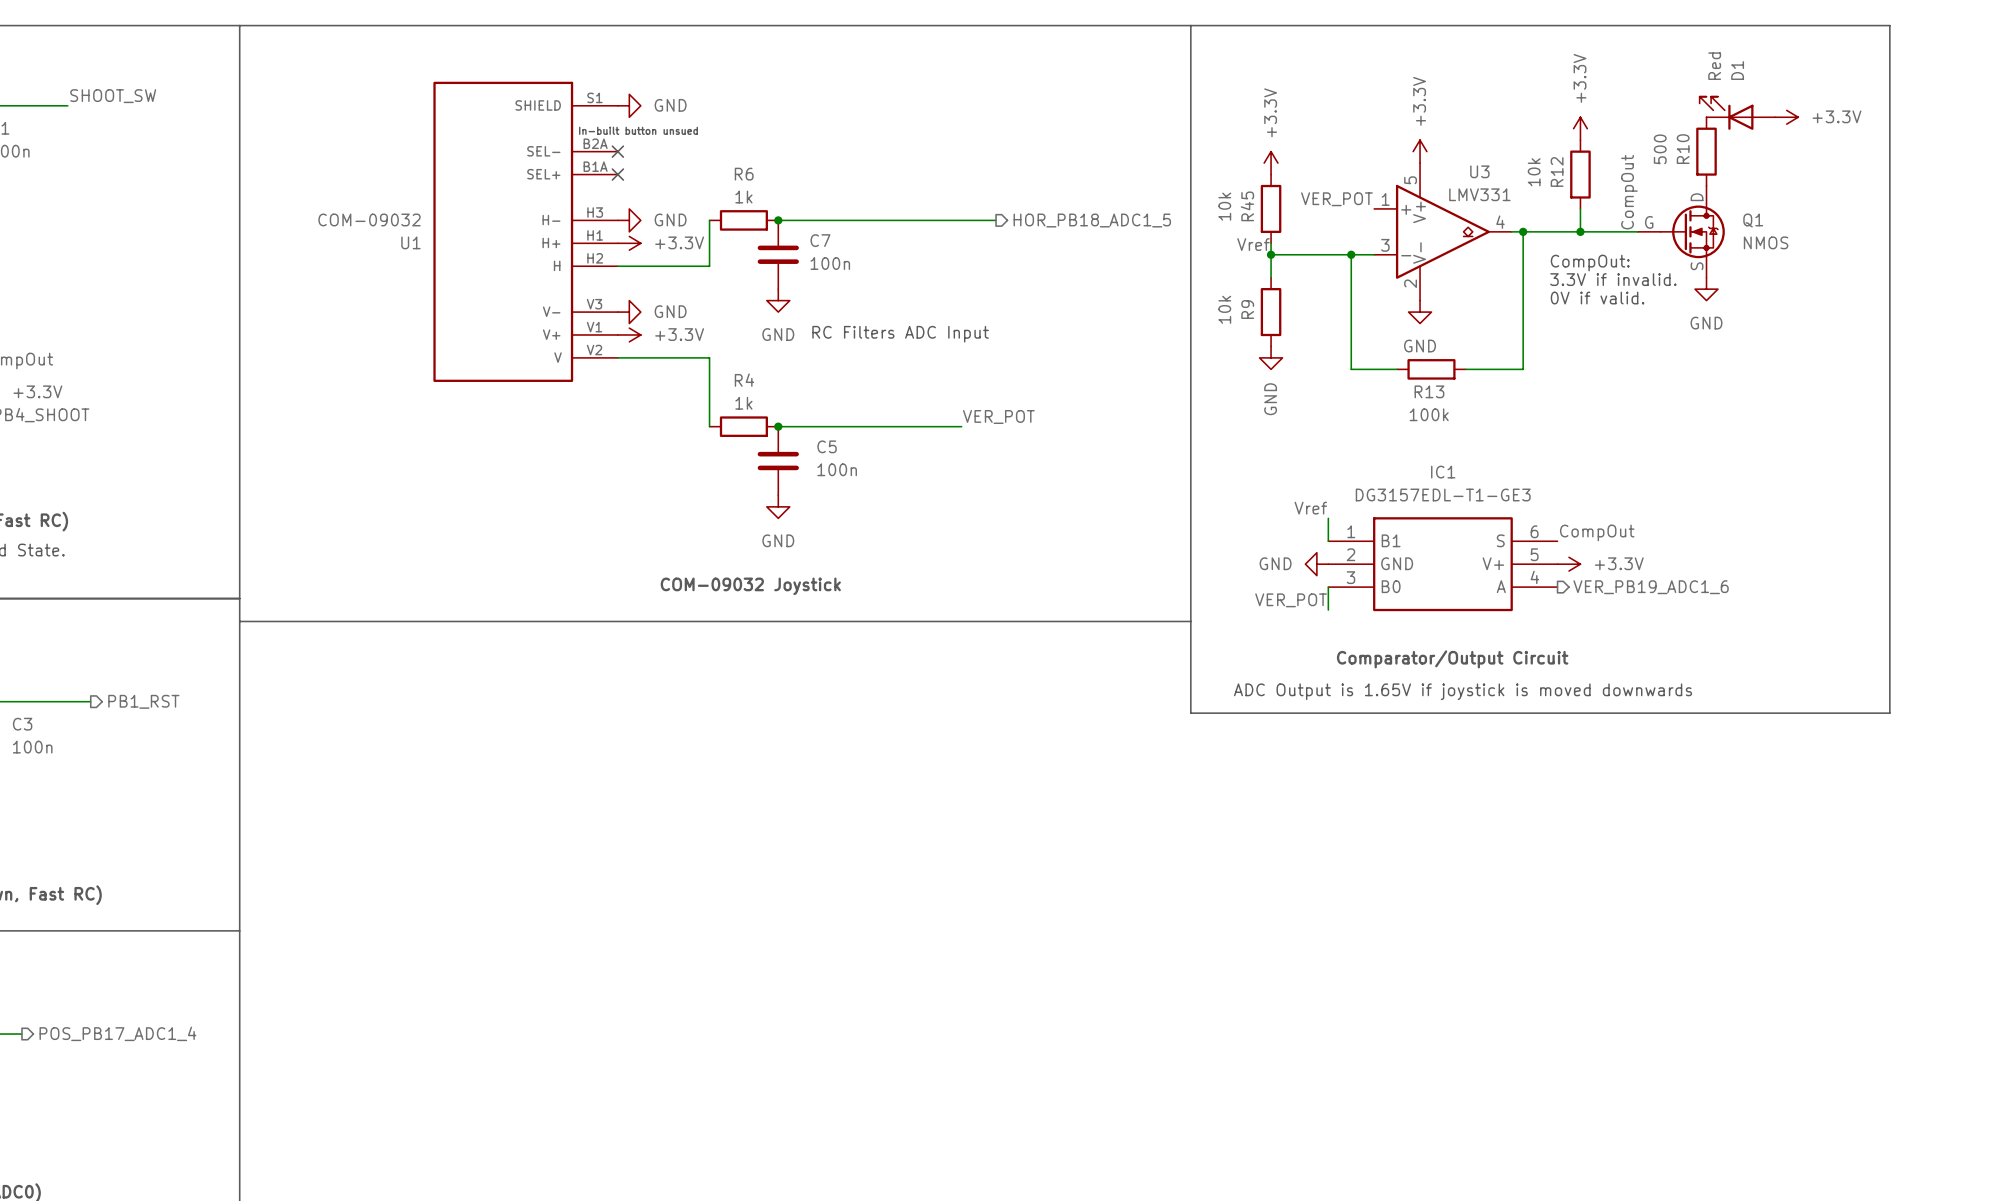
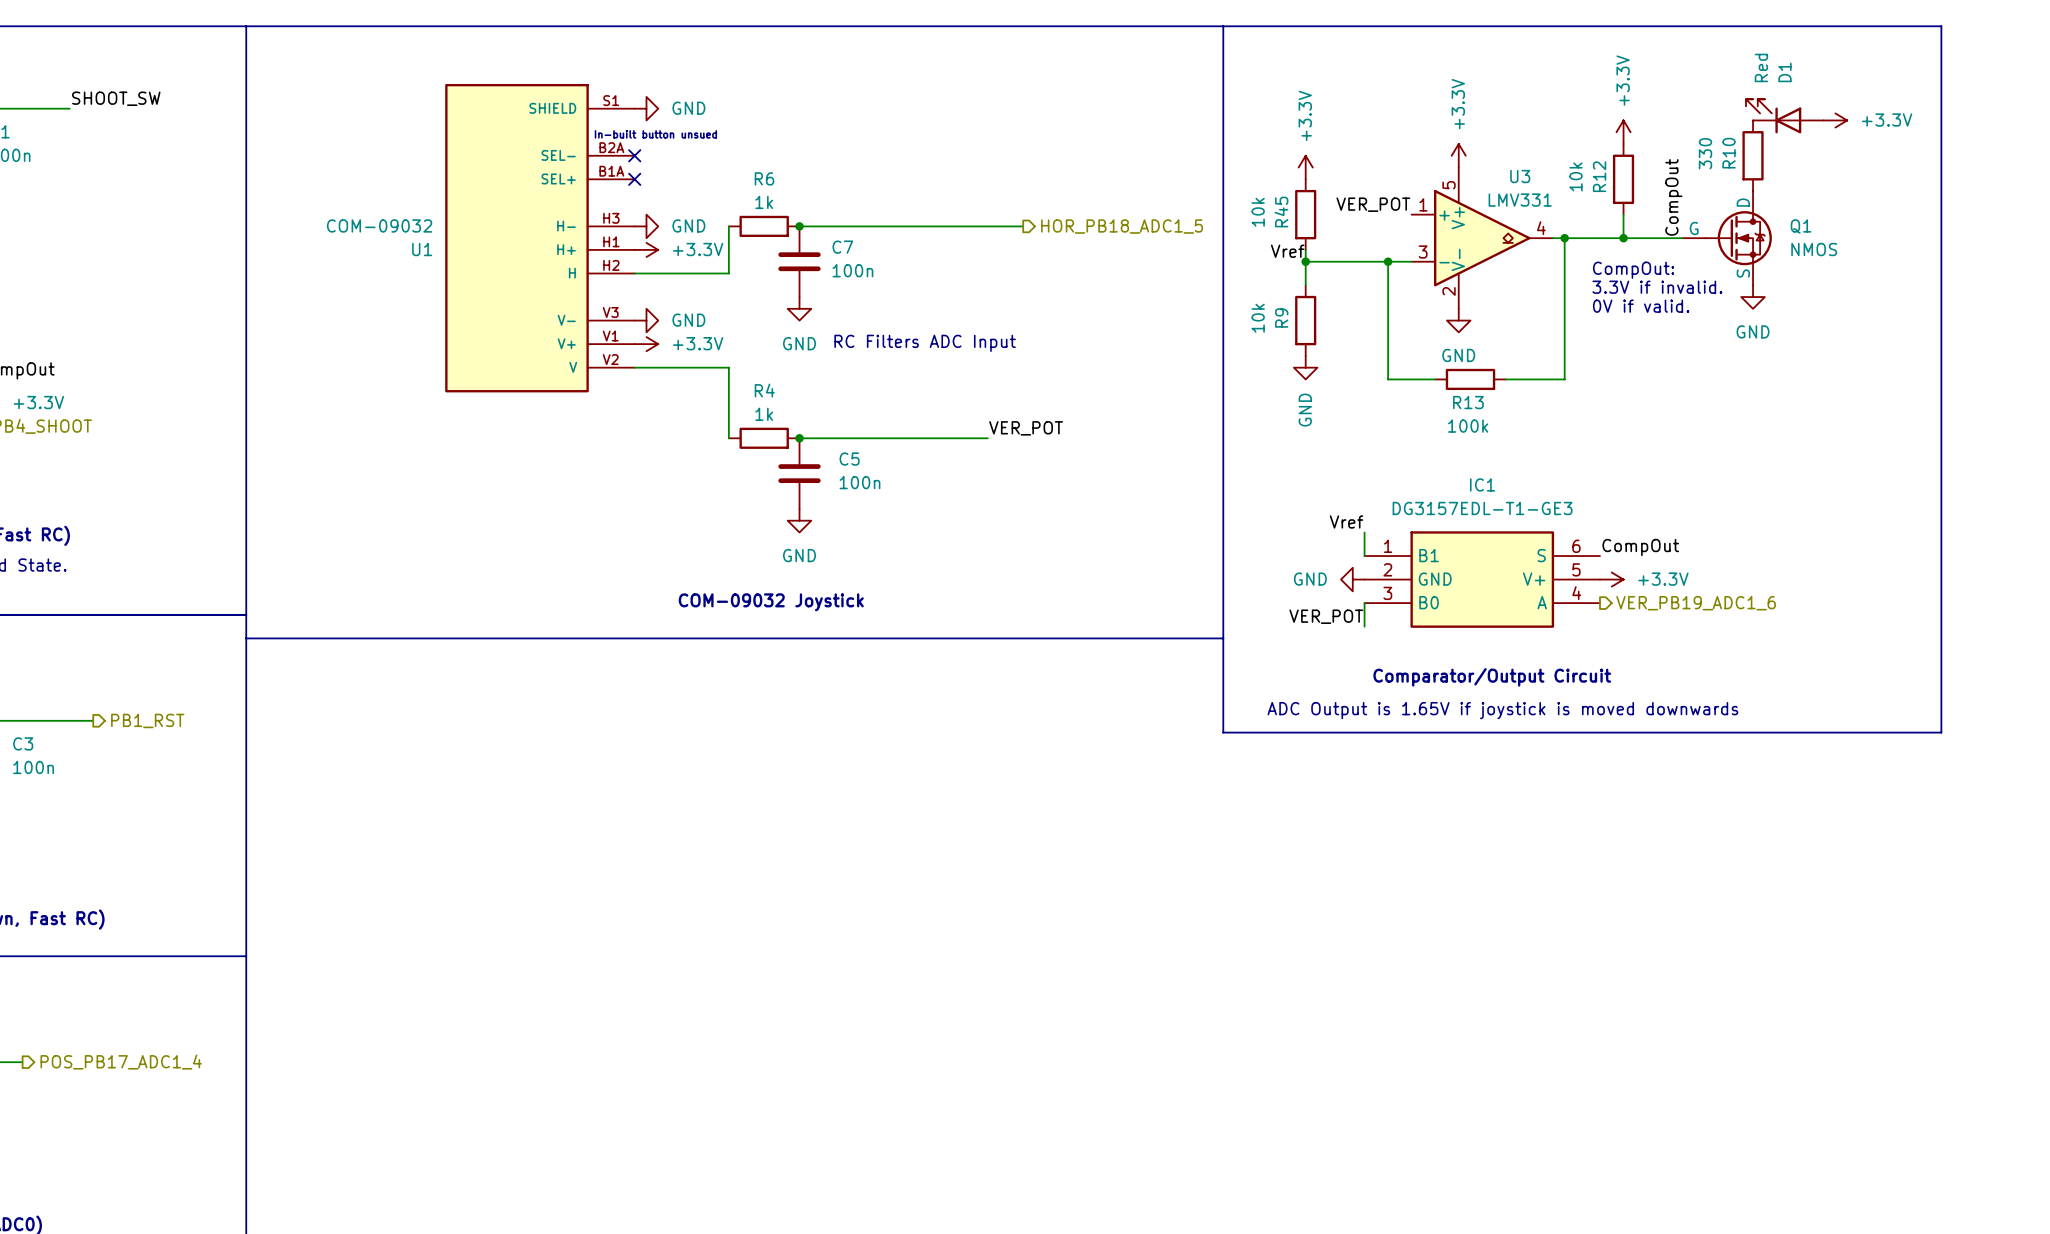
R10 value: 500 (1660, 149) -> 330 (1705, 153)

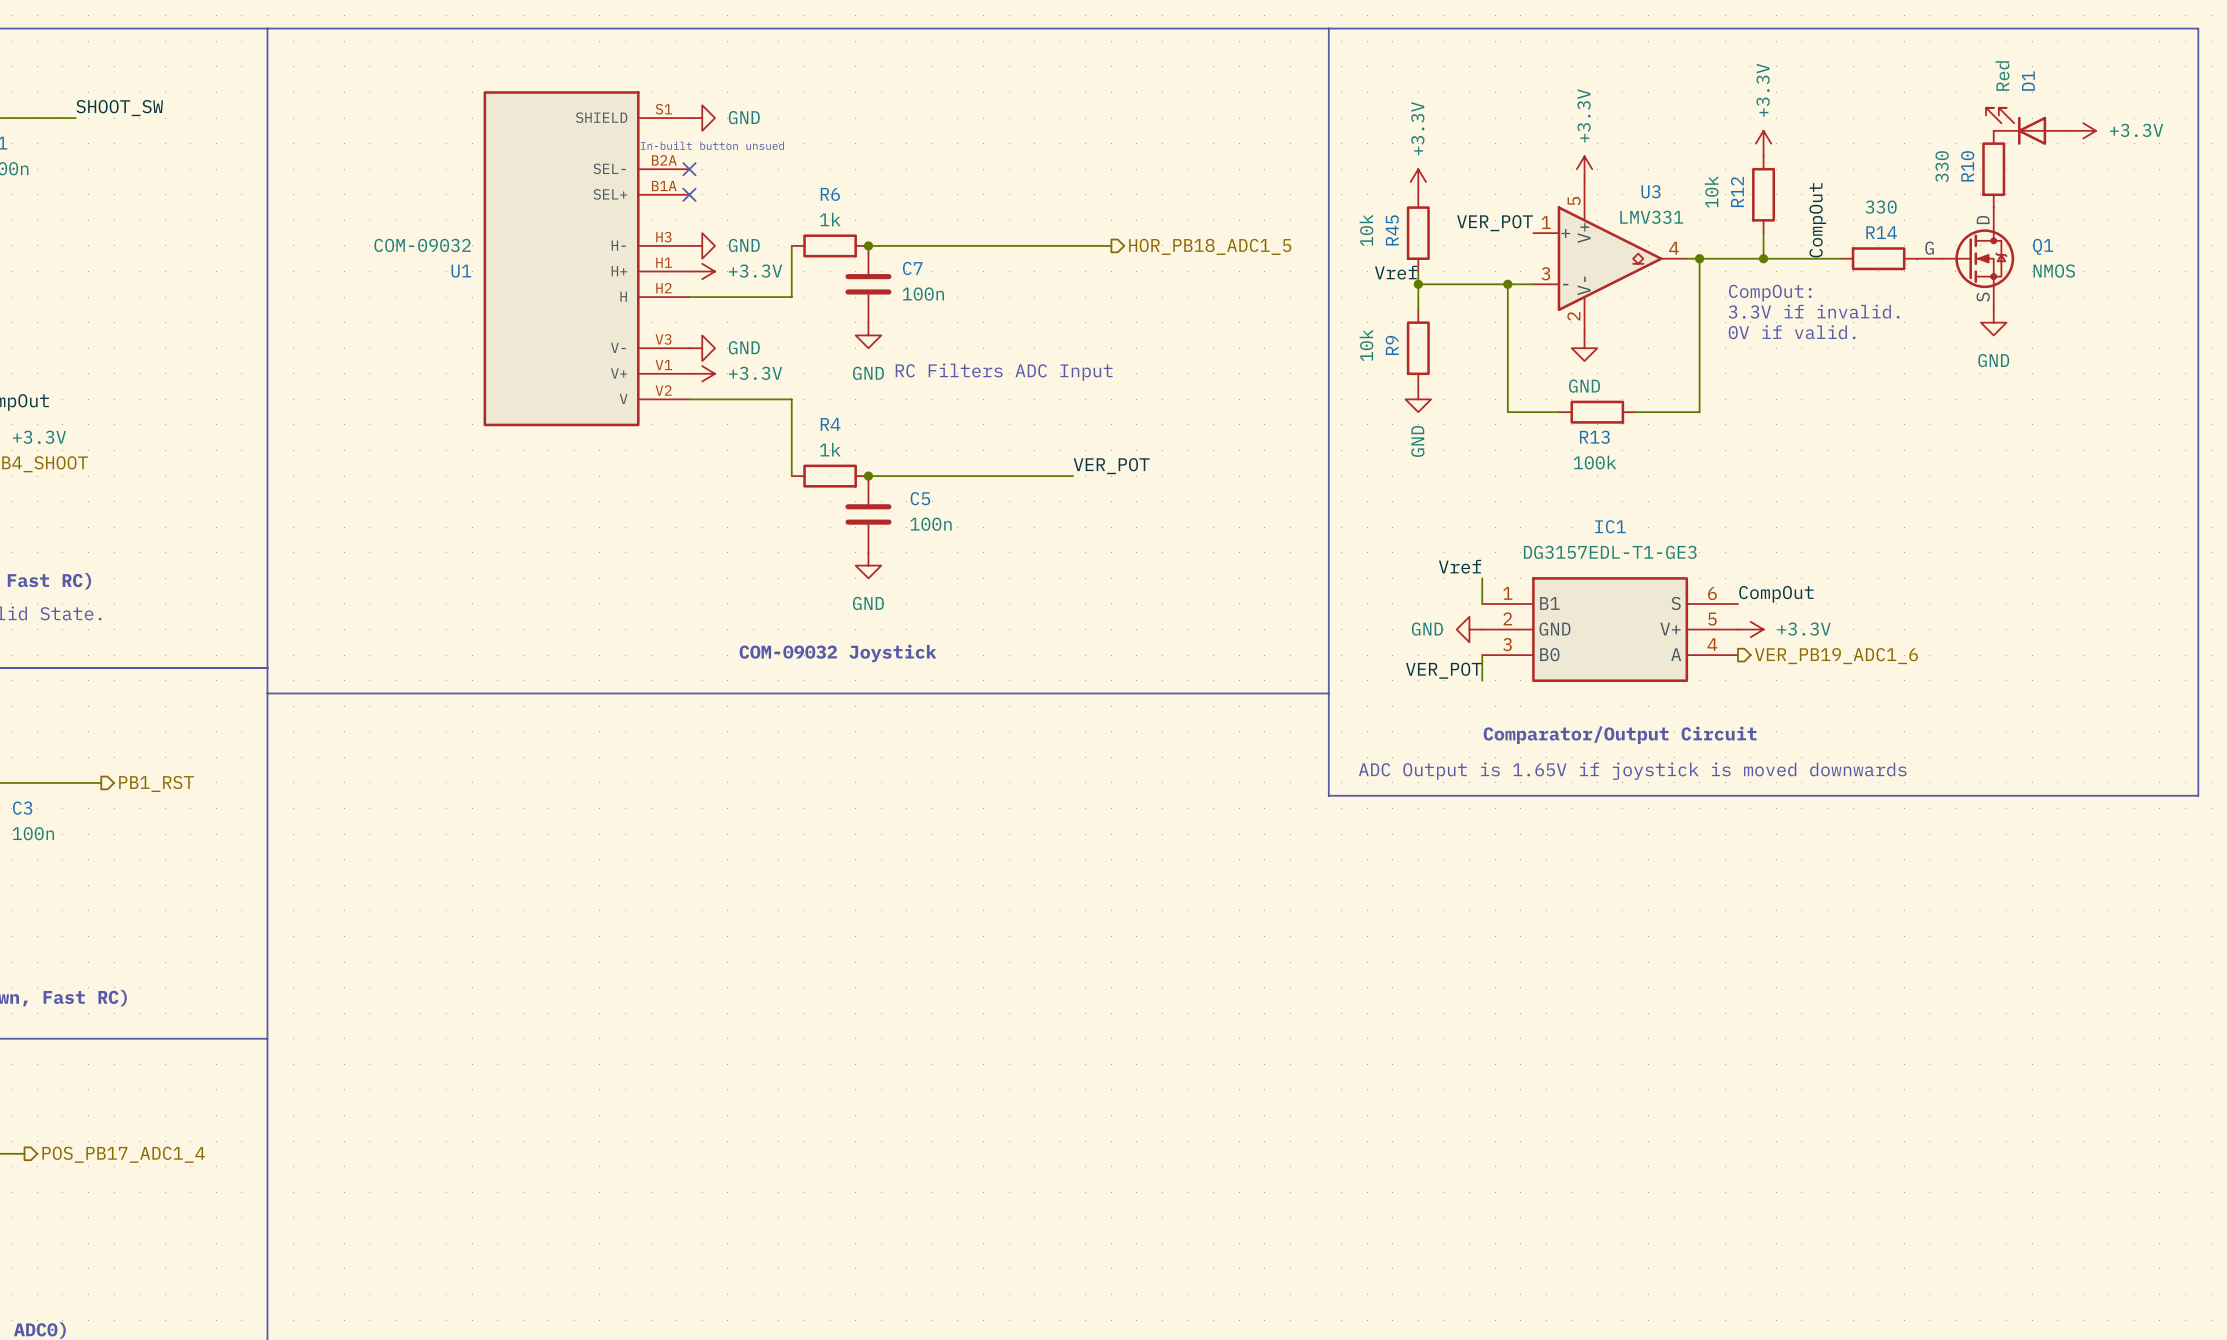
line: (1941, 26) (1941, 732) -> (2108, 28) (2198, 28) (2198, 795) (2108, 795)
D1 position: (1784, 116) -> (2028, 126)
power symbol position: +3.3V (1835, 120) -> +3.3V (2083, 130)
R10 position: (1753, 155) -> (1993, 169)
Q1 position: (1727, 238) -> (1965, 258)
R14: none -> 330 (1878, 258)
power symbol position: GND (1753, 297) -> GND (1993, 322)

